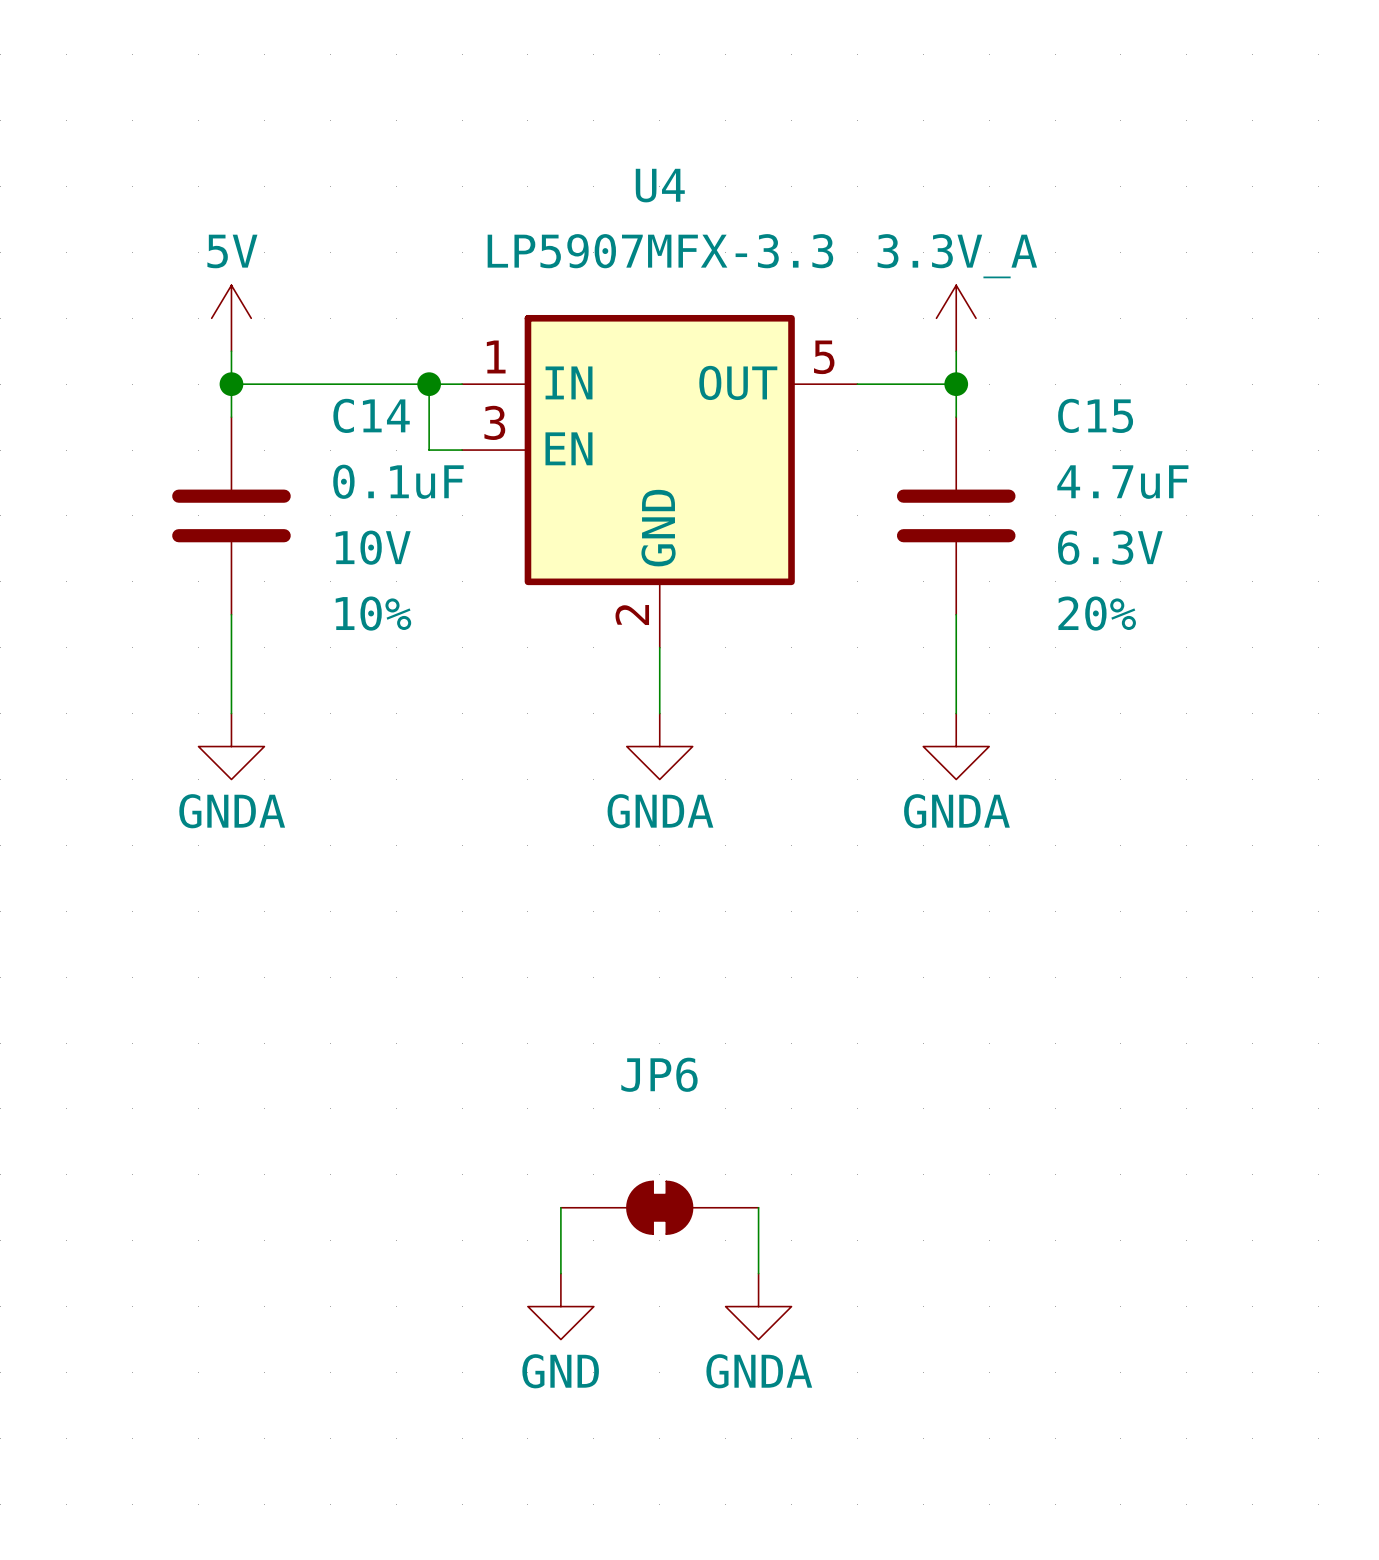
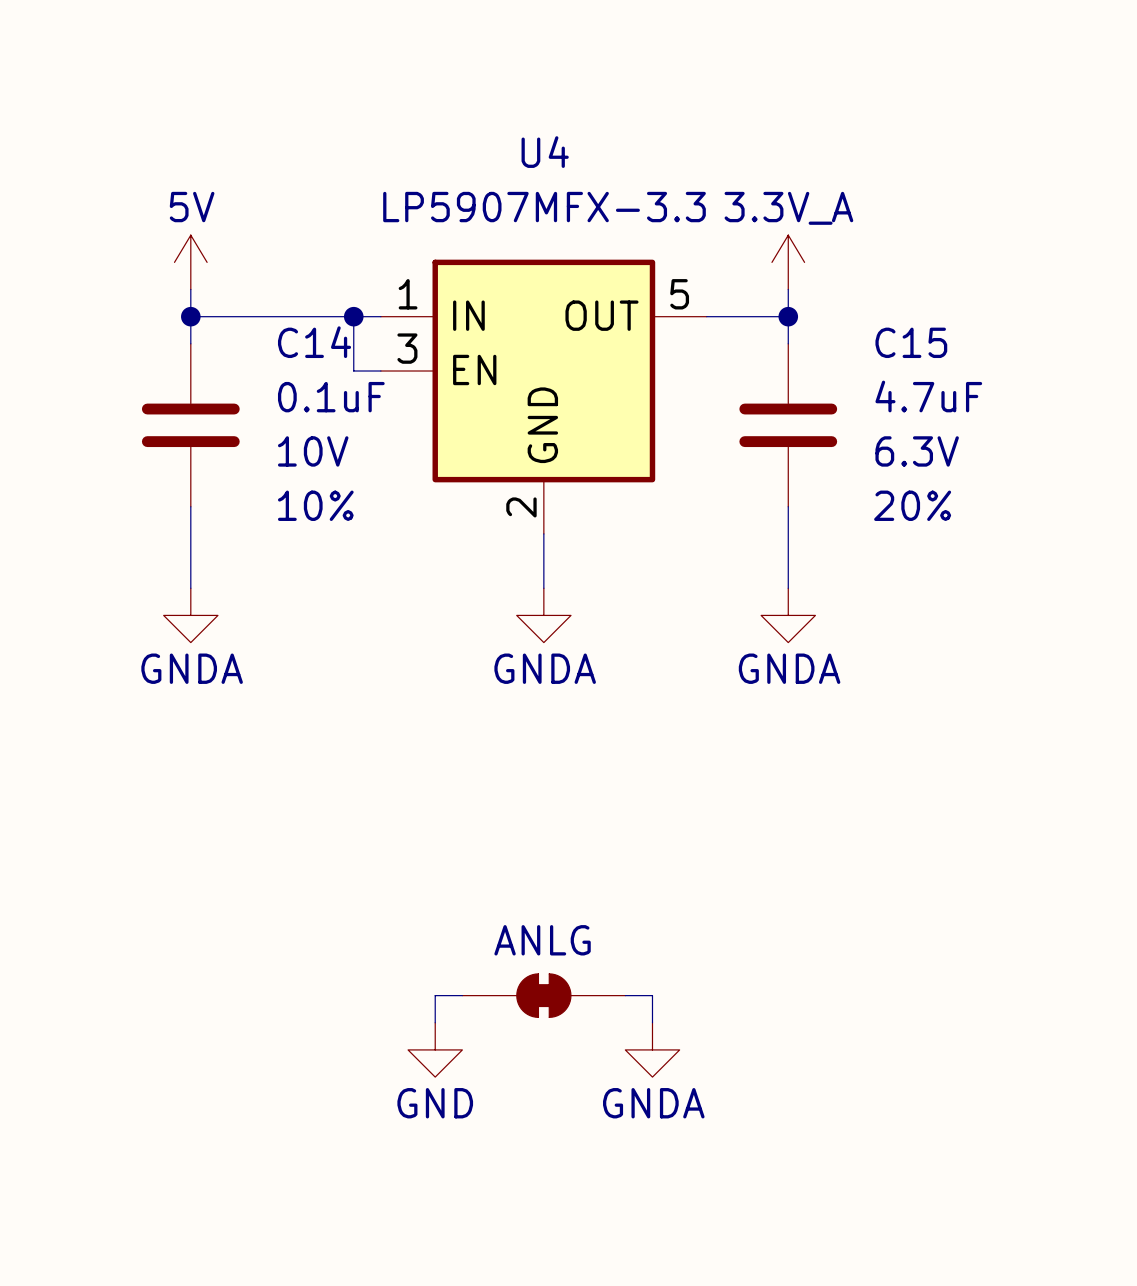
JP6 name: JP6 (659, 1074) -> none
JP6 value: none -> ANLG (542, 940)
wire: (560, 1207) (560, 1273) -> (462, 995) (435, 995) (435, 1022)
wire: (758, 1207) (758, 1273) -> (625, 995) (652, 995) (652, 1022)
power symbol position: GND (560, 1306) -> GND (435, 1049)
power symbol position: GNDA (758, 1306) -> GNDA (652, 1049)

